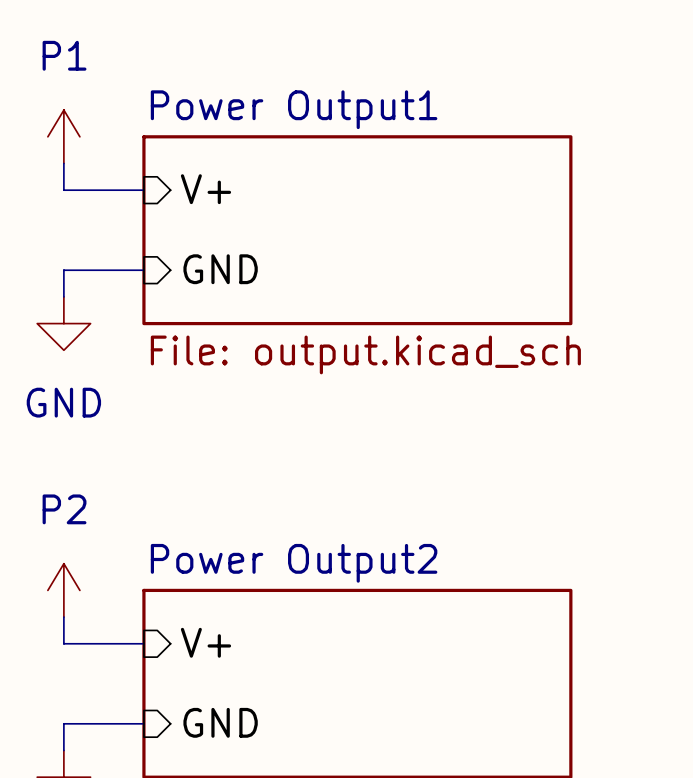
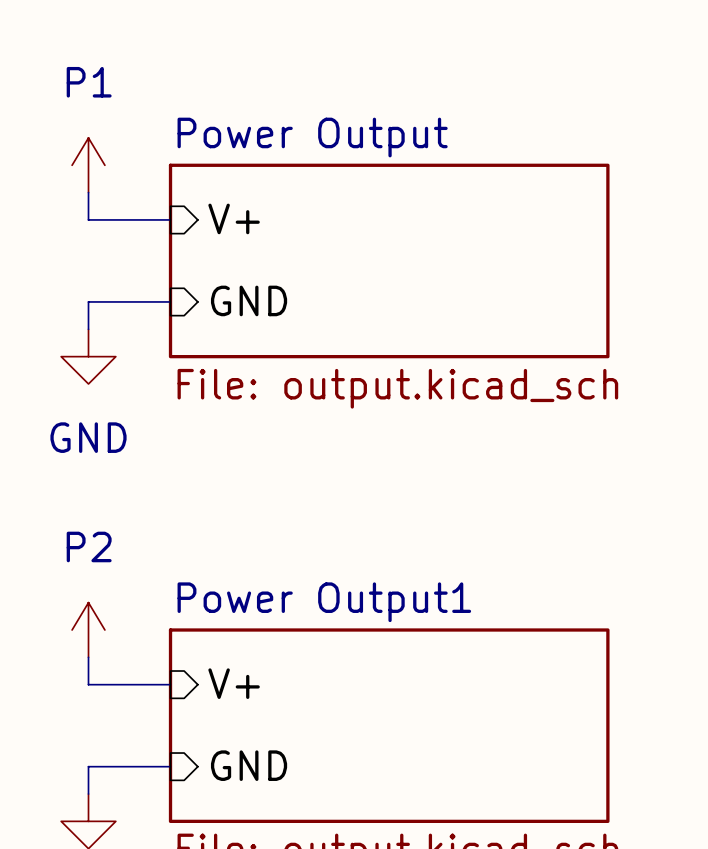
sheet Power Output1 name: Power Output1 (294, 109) -> Power Output (312, 137)
sheet Power Output2 name: Power Output2 (294, 563) -> Power Output1 (324, 602)

